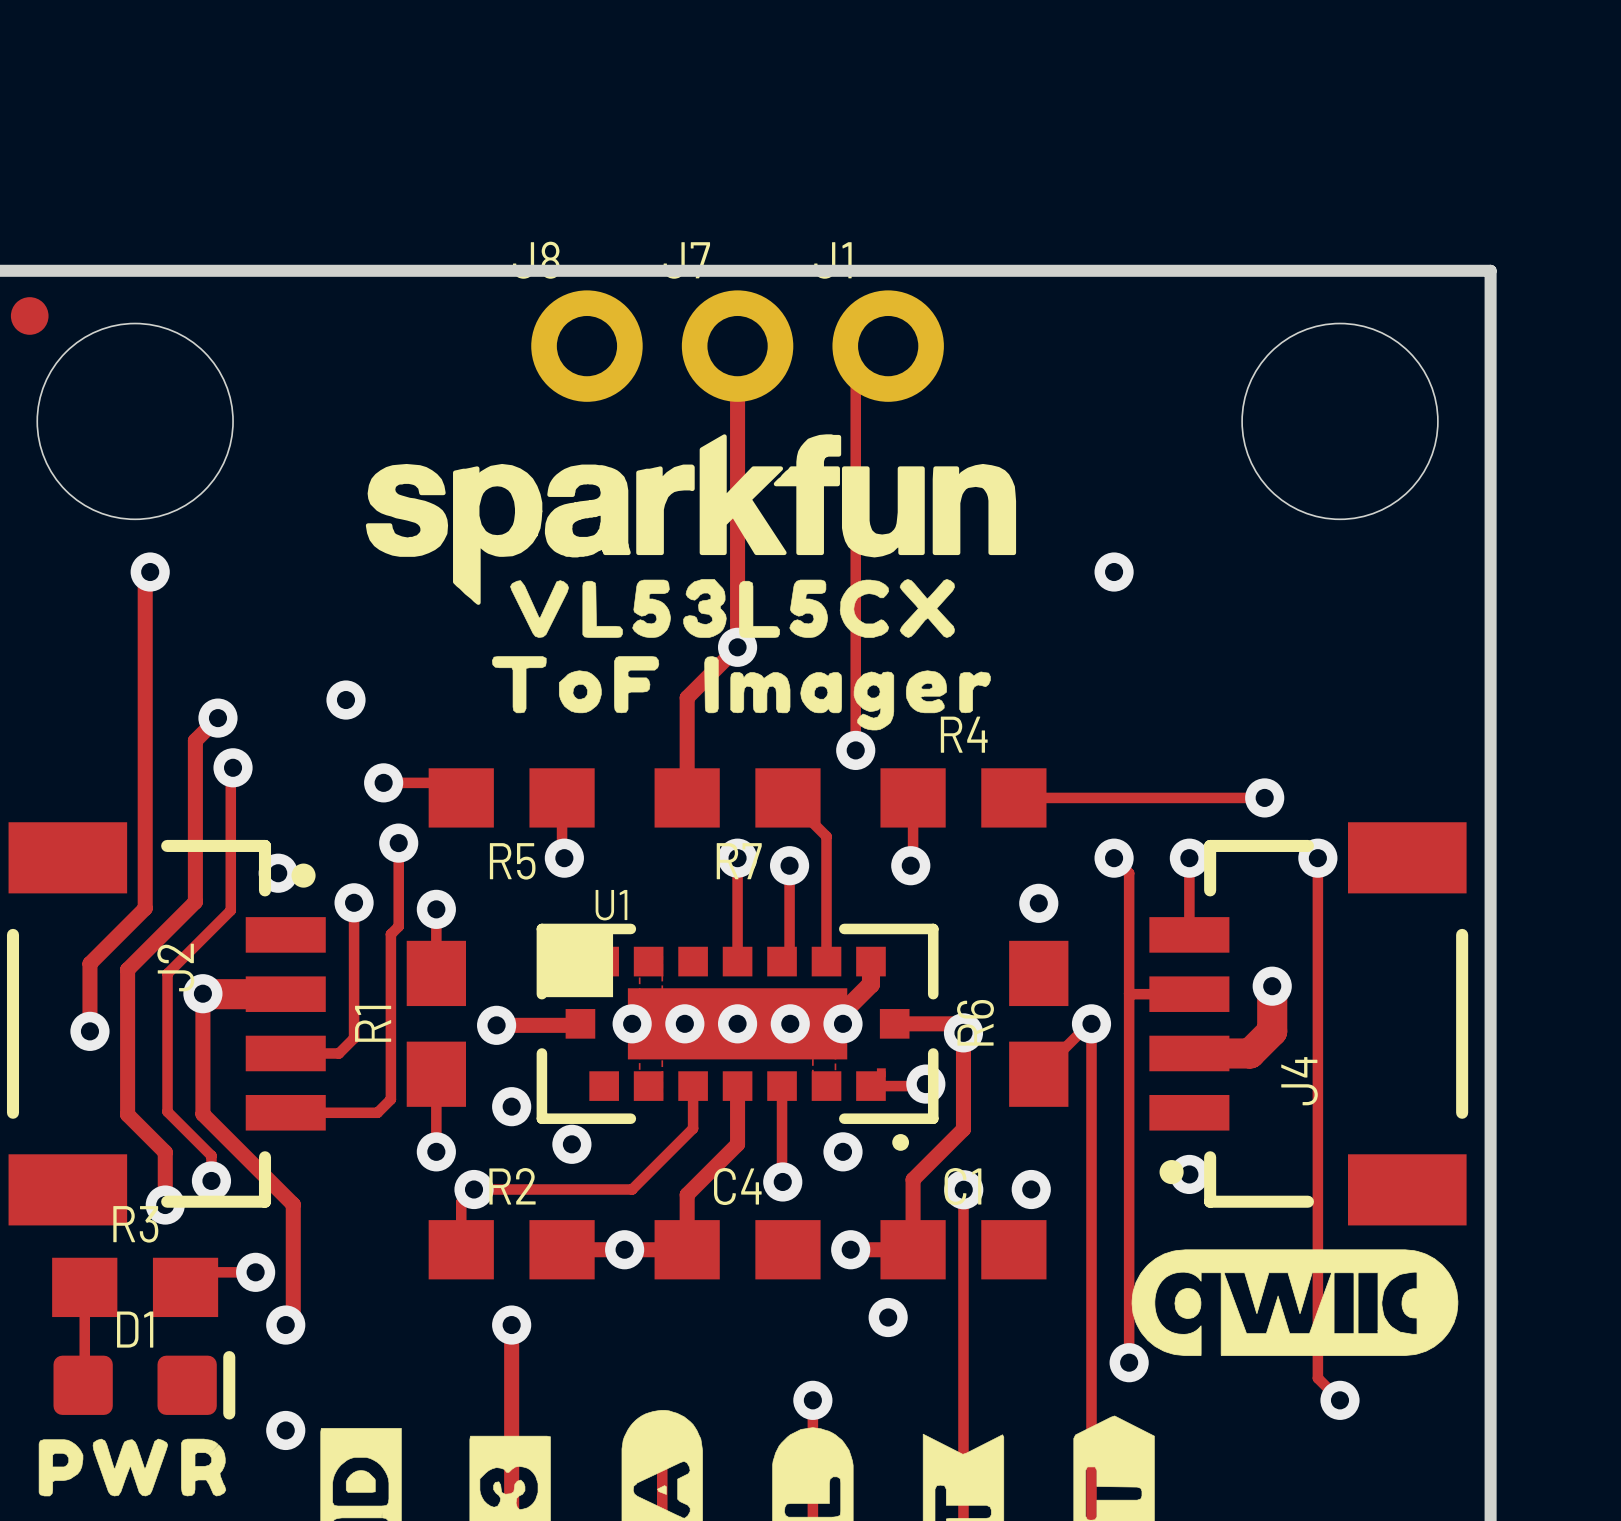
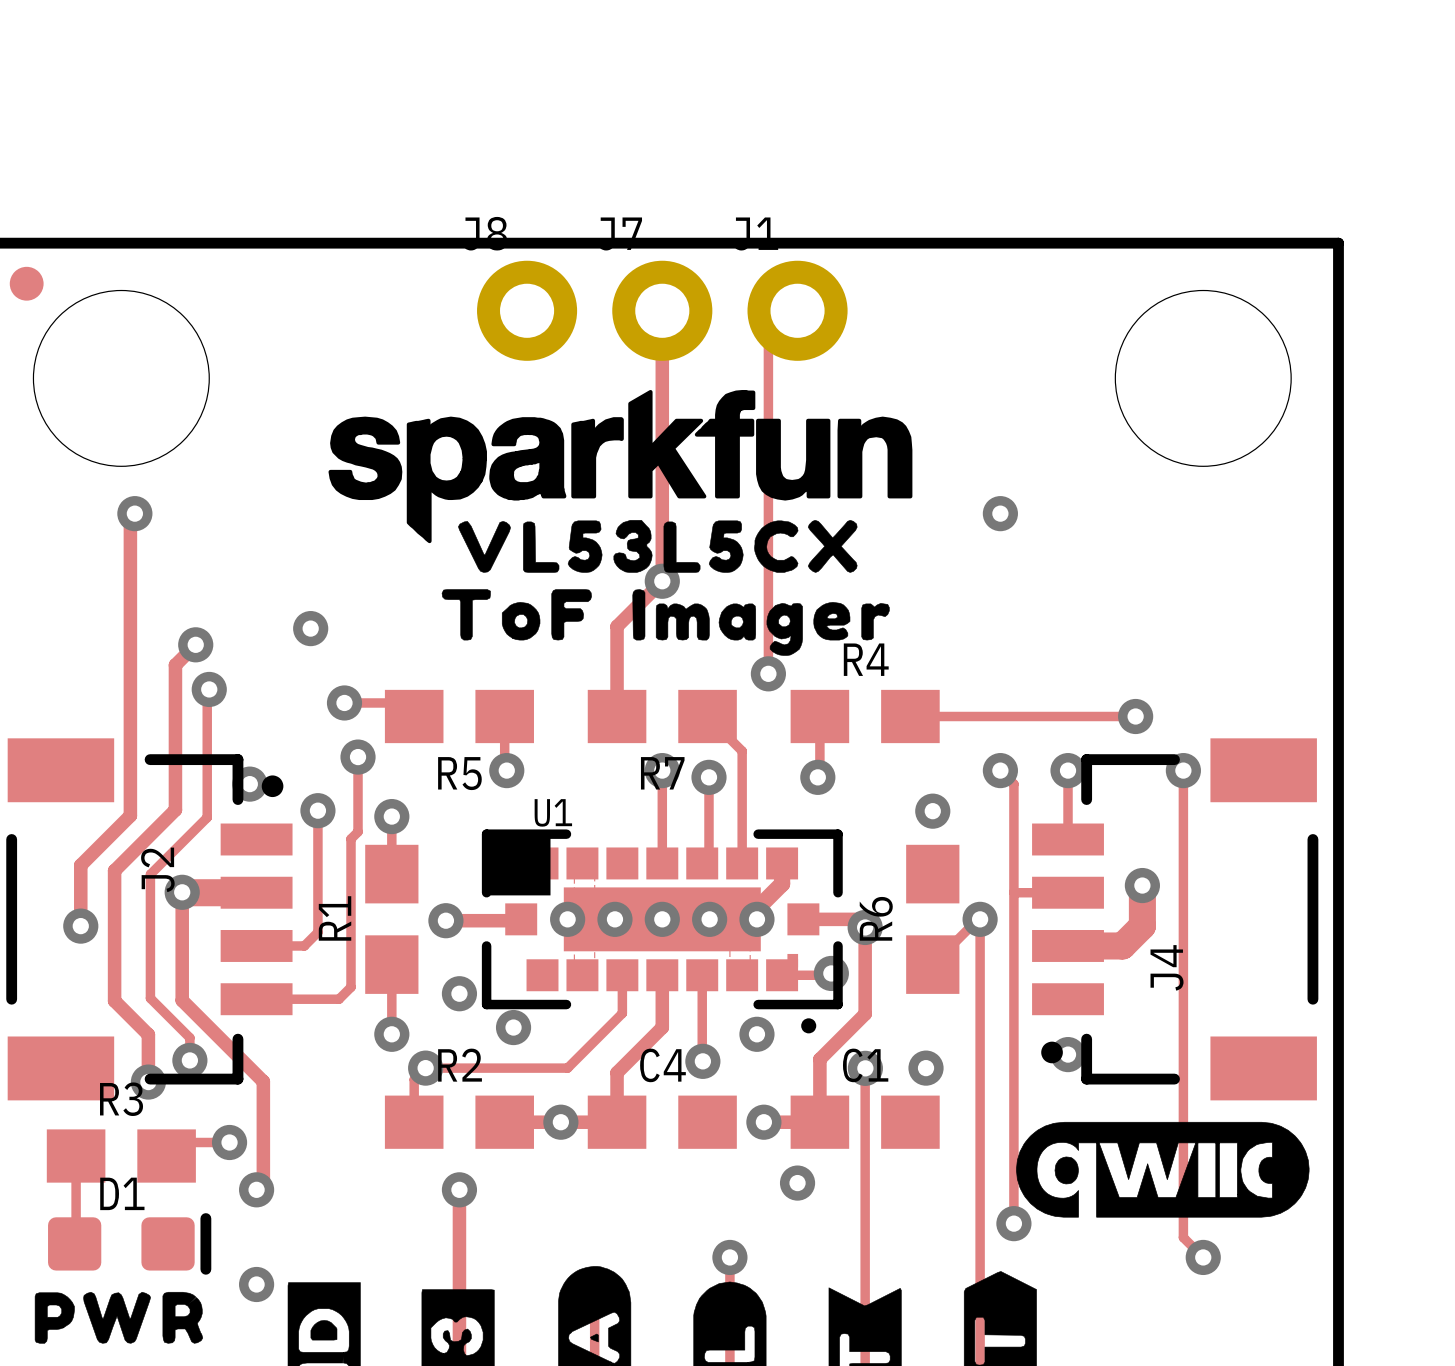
U1 footprint: [536, 923, 939, 1151] -> [481, 829, 843, 1034]

